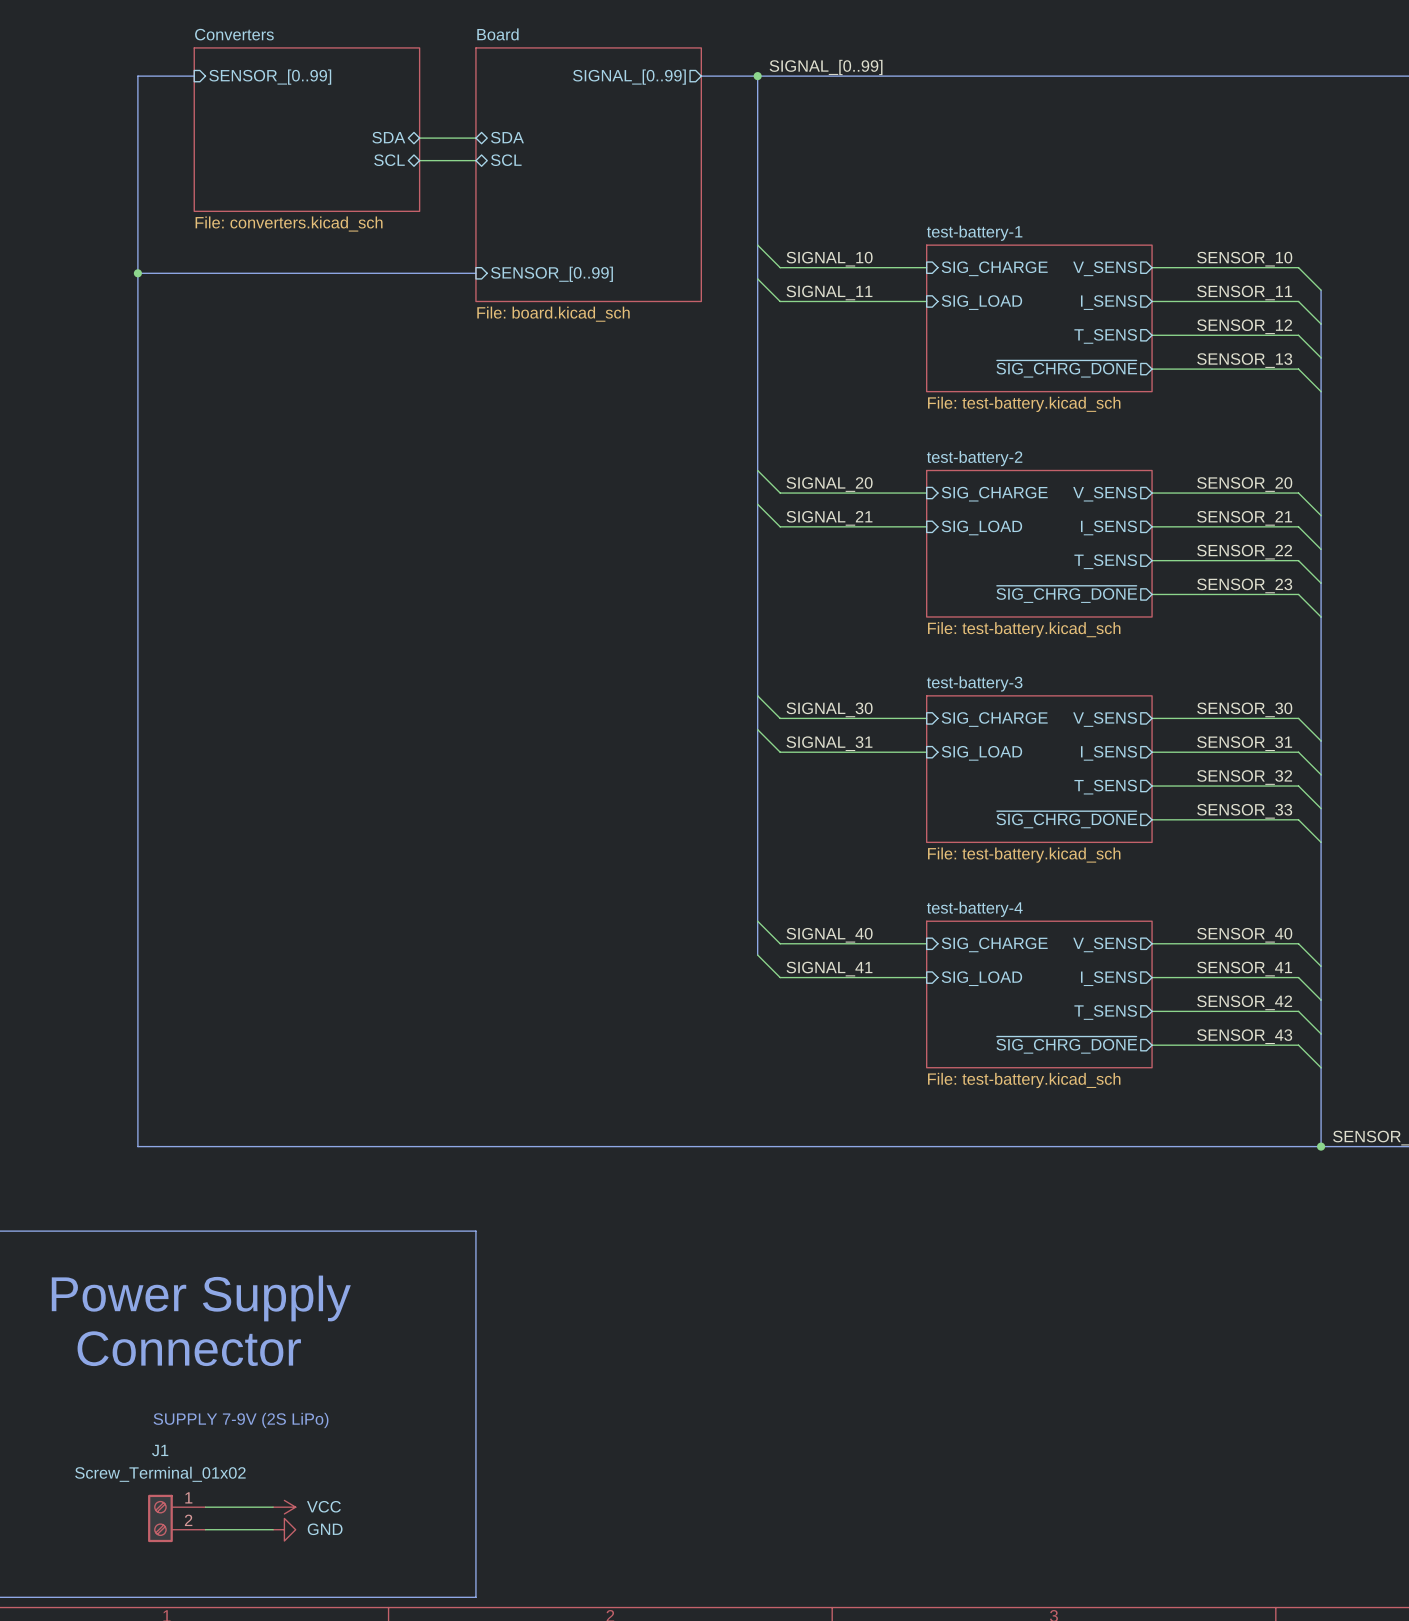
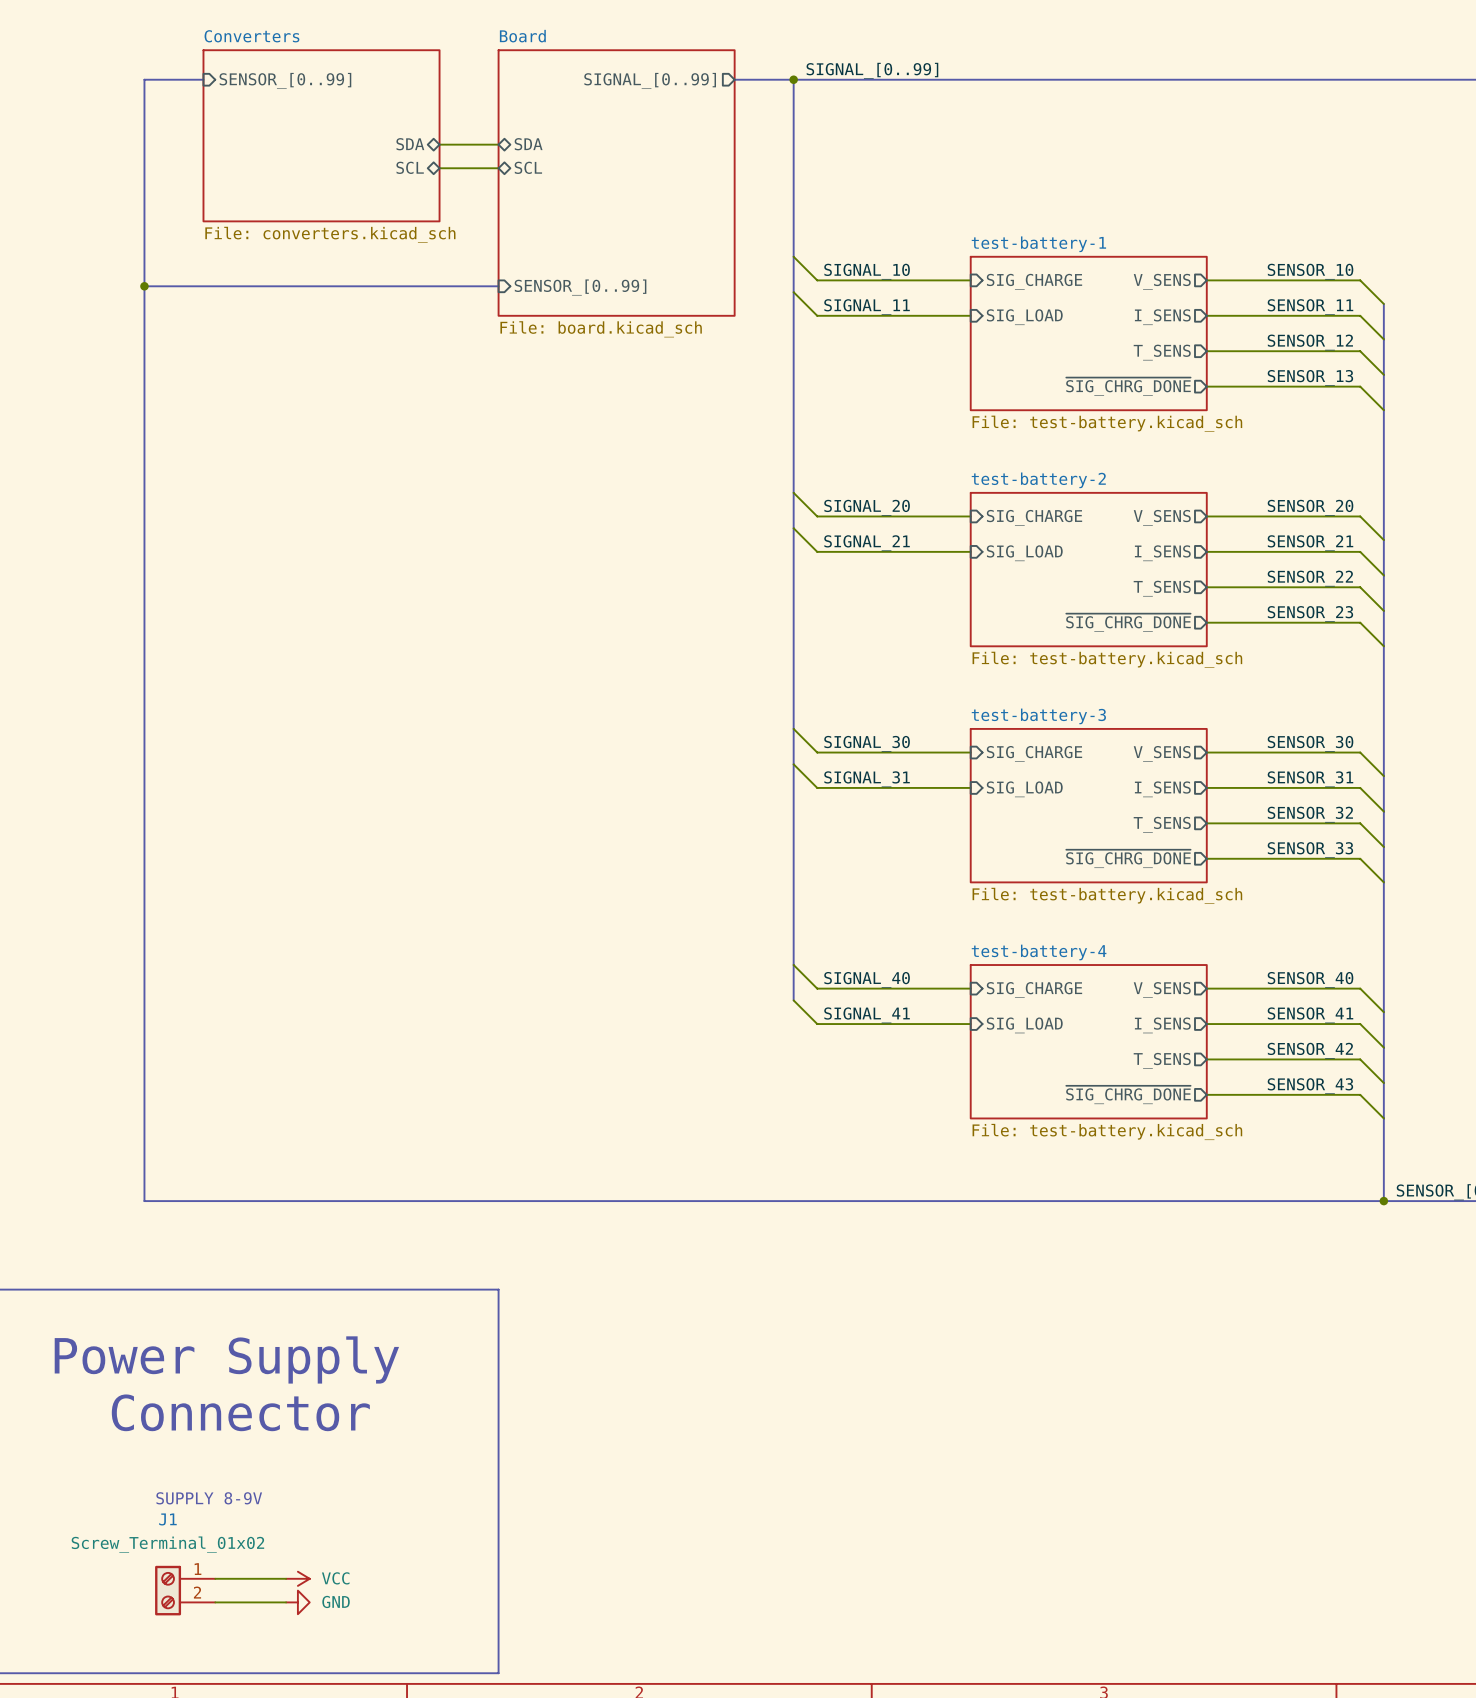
text: SUPPLY 7-9V (2S LiPo) (241, 1420) -> SUPPLY 8-9V (209, 1498)

